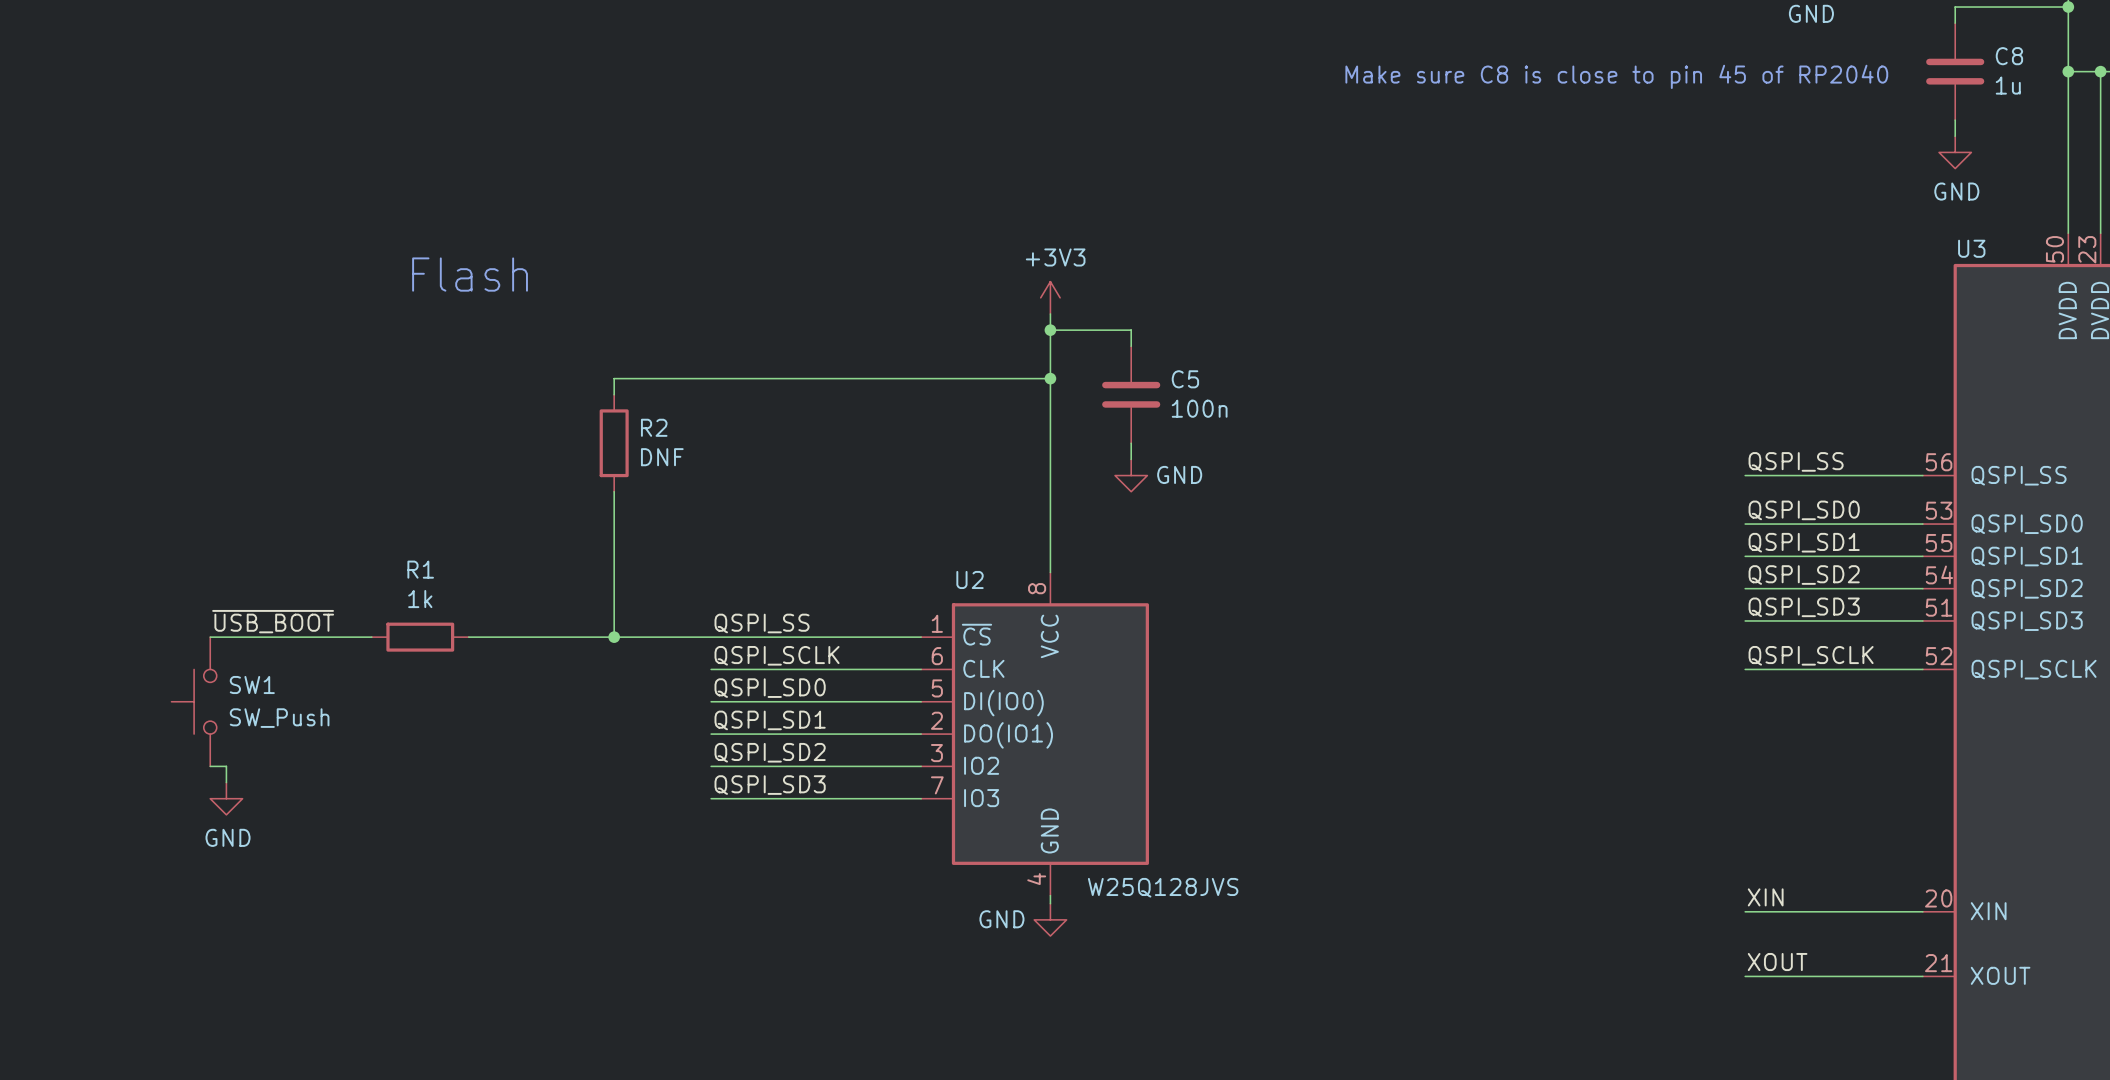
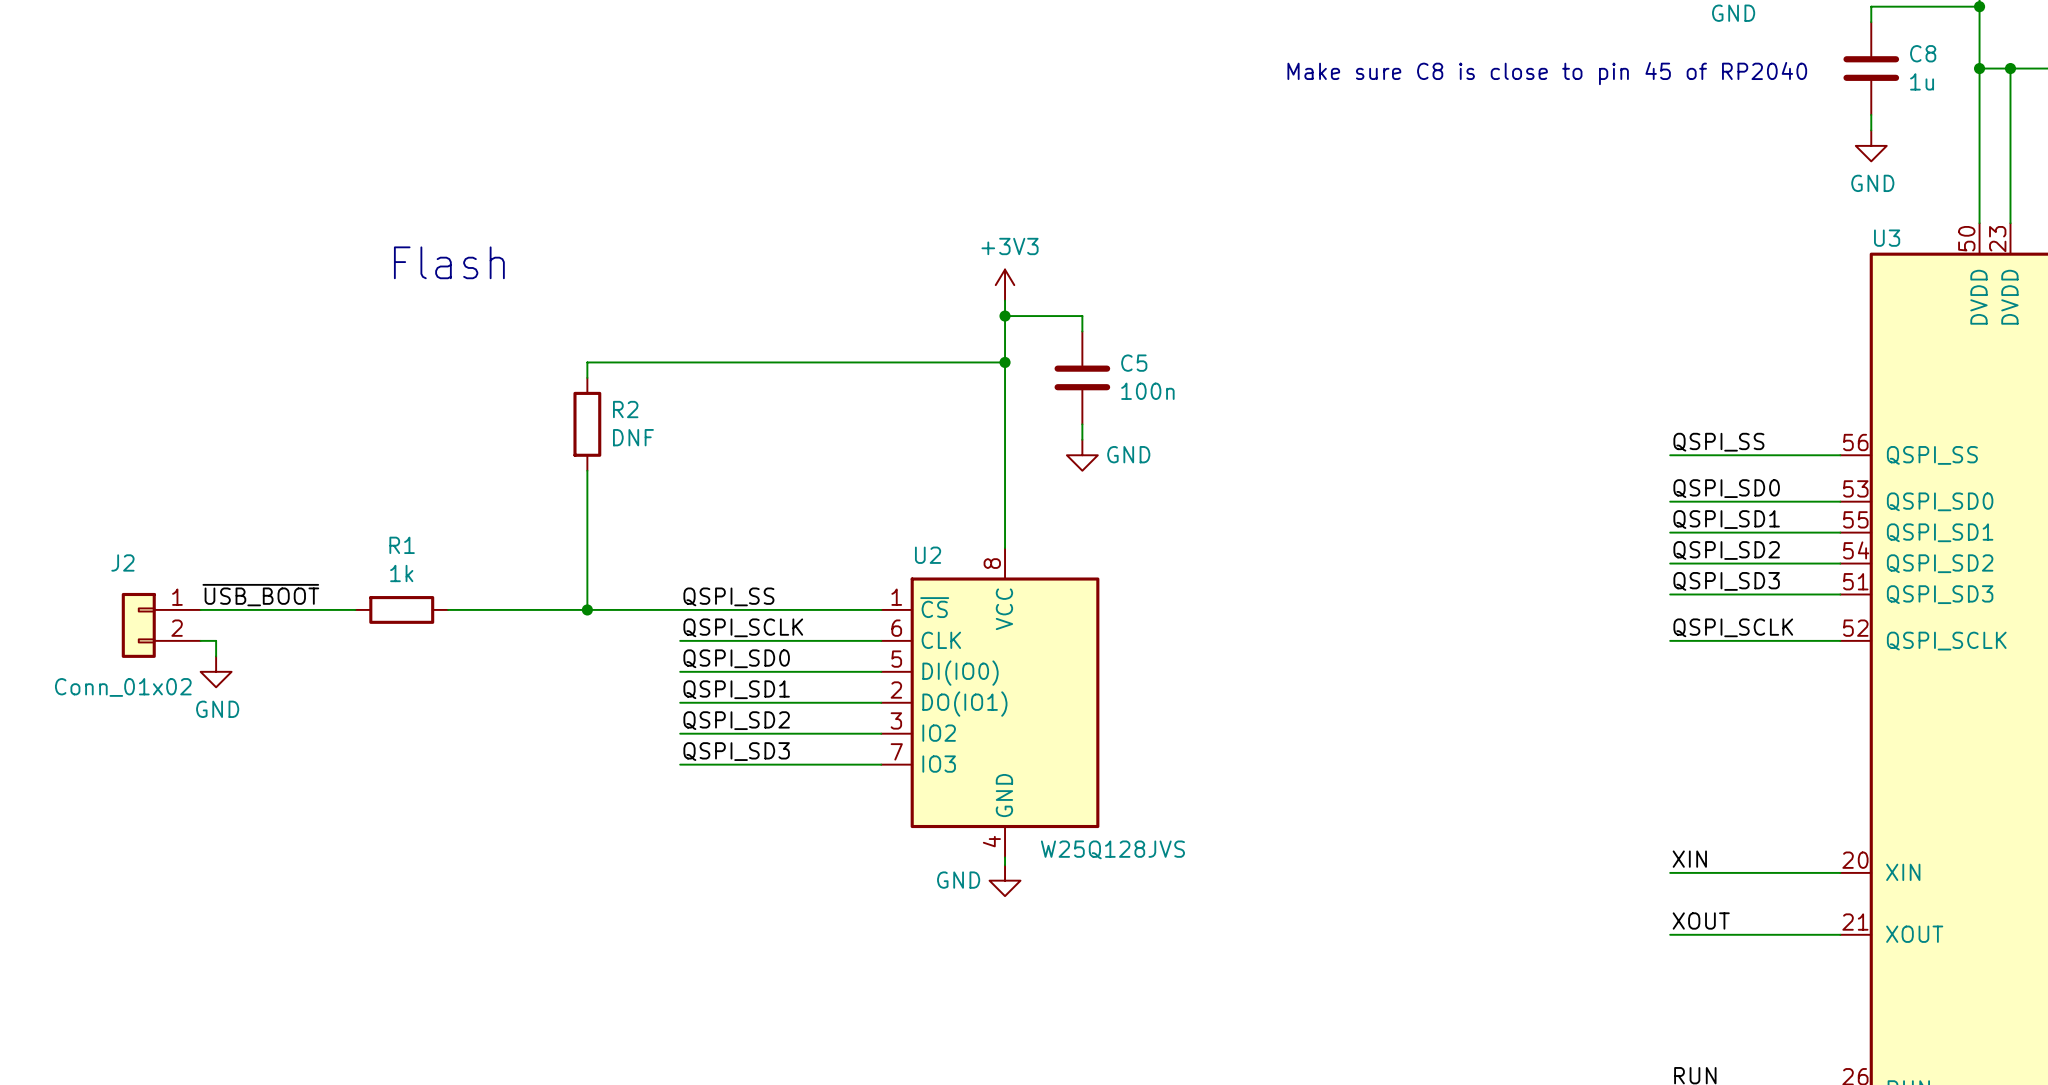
J2: none -> Conn_01x02 (161, 625)
SW1: SW_Push (194, 701) -> none
wire: (210, 766) (226, 766) (226, 782) -> (200, 640) (216, 640) (216, 656)
power symbol position: GND (226, 798) -> GND (216, 671)

